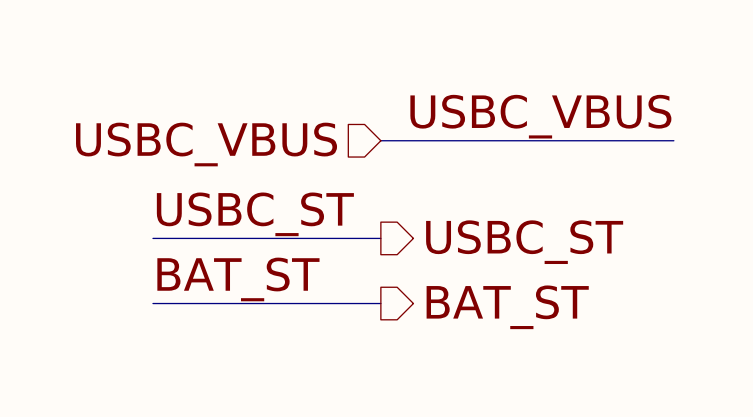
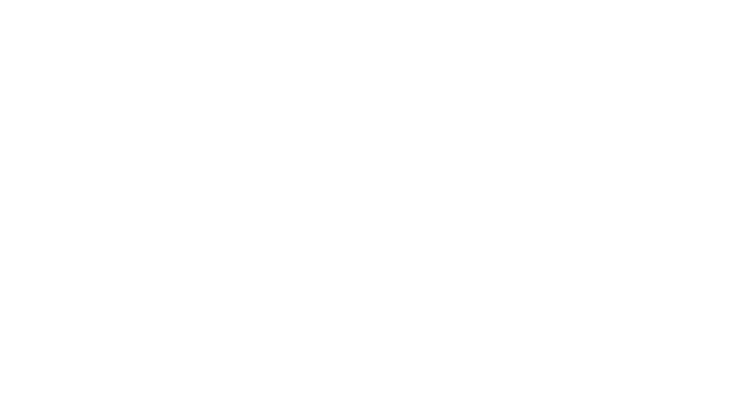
label: USBC_VBUS (540, 116) -> none
wire: (380, 140) (673, 140) -> none
hierarchical label: USBC_VBUS (206, 144) -> none
label: USBC_ST (255, 214) -> none
wire: (152, 238) (380, 238) -> none
hierarchical label: USBC_ST (524, 242) -> none
label: BAT_ST (238, 279) -> none
wire: (152, 303) (380, 303) -> none
hierarchical label: BAT_ST (507, 307) -> none

